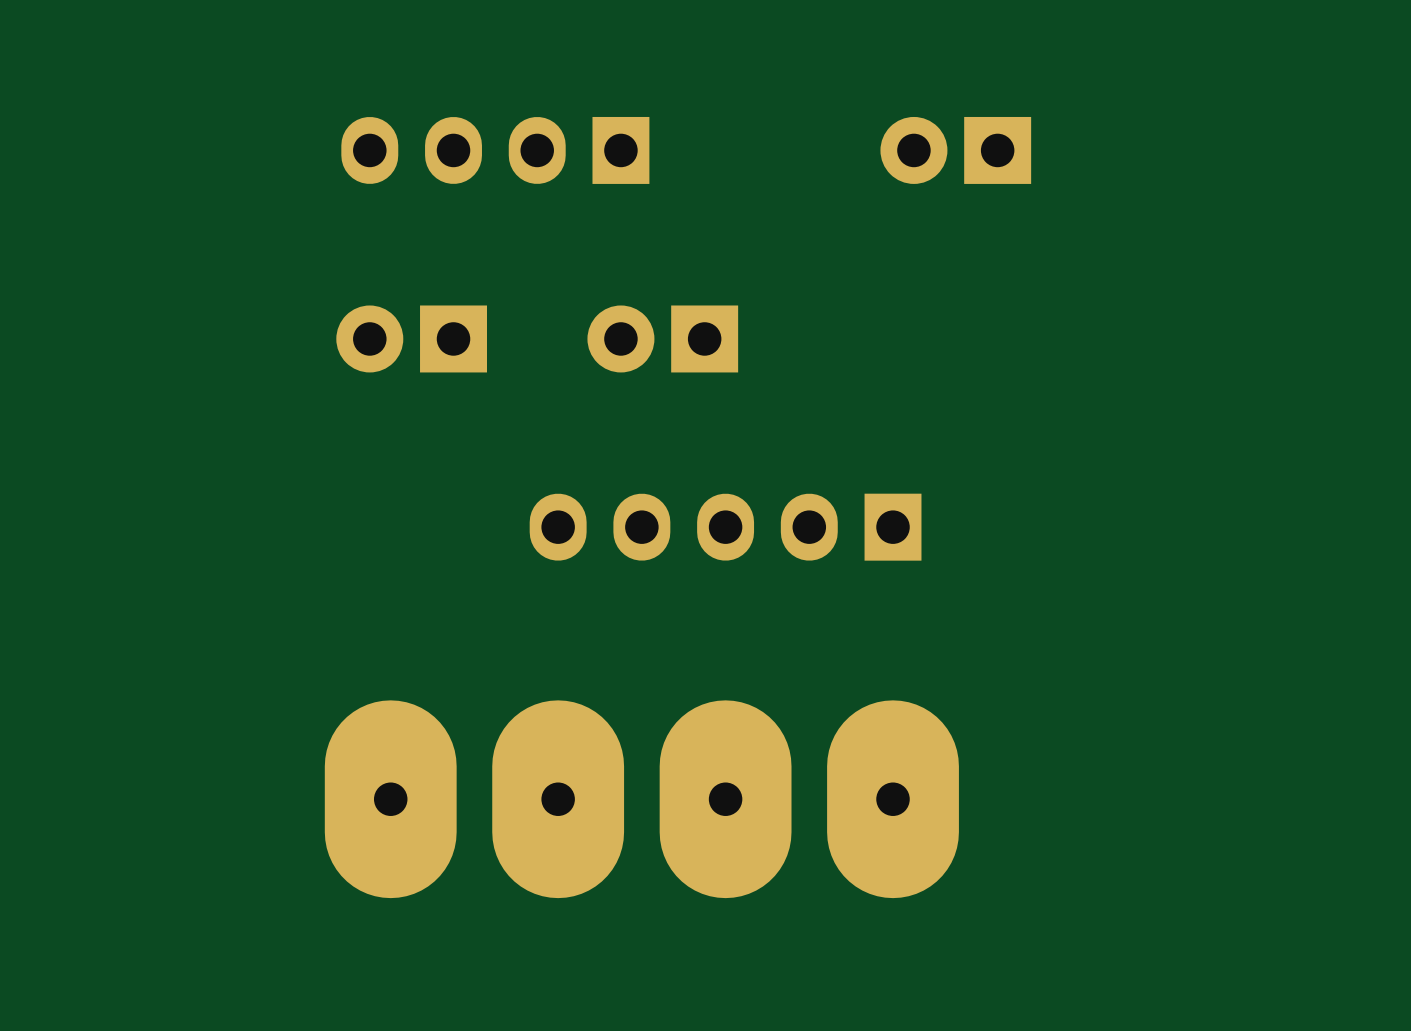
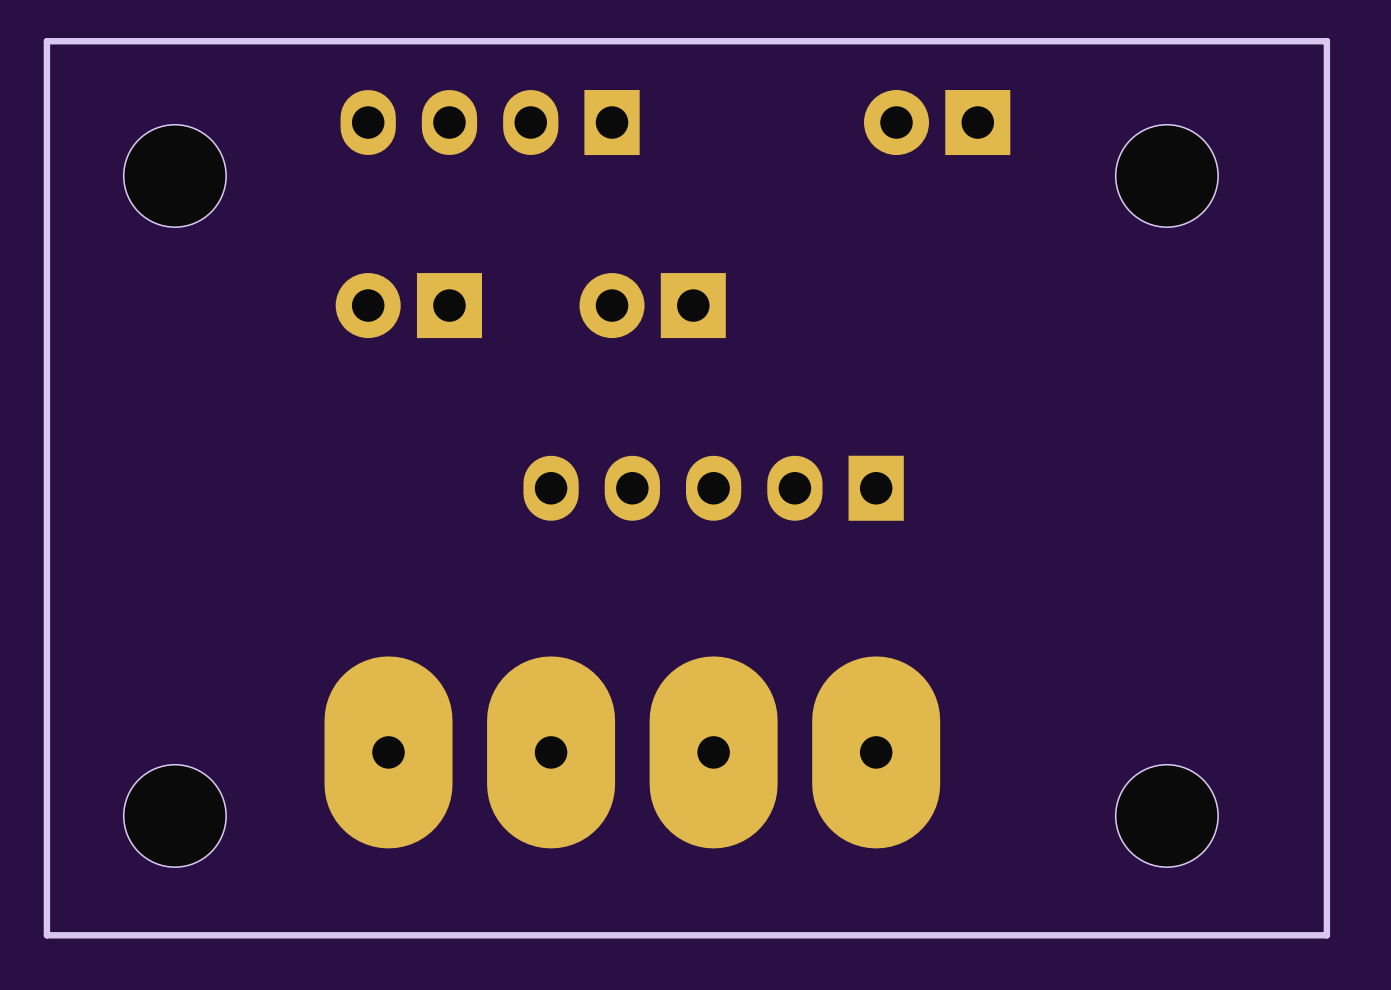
board edge: none -> (1326, 41) (1326, 935) (46, 935) (46, 41) (1326, 41)
part: none -> (174, 175)
part: none -> (1166, 175)
part: none -> (174, 815)
part: none -> (1166, 815)

